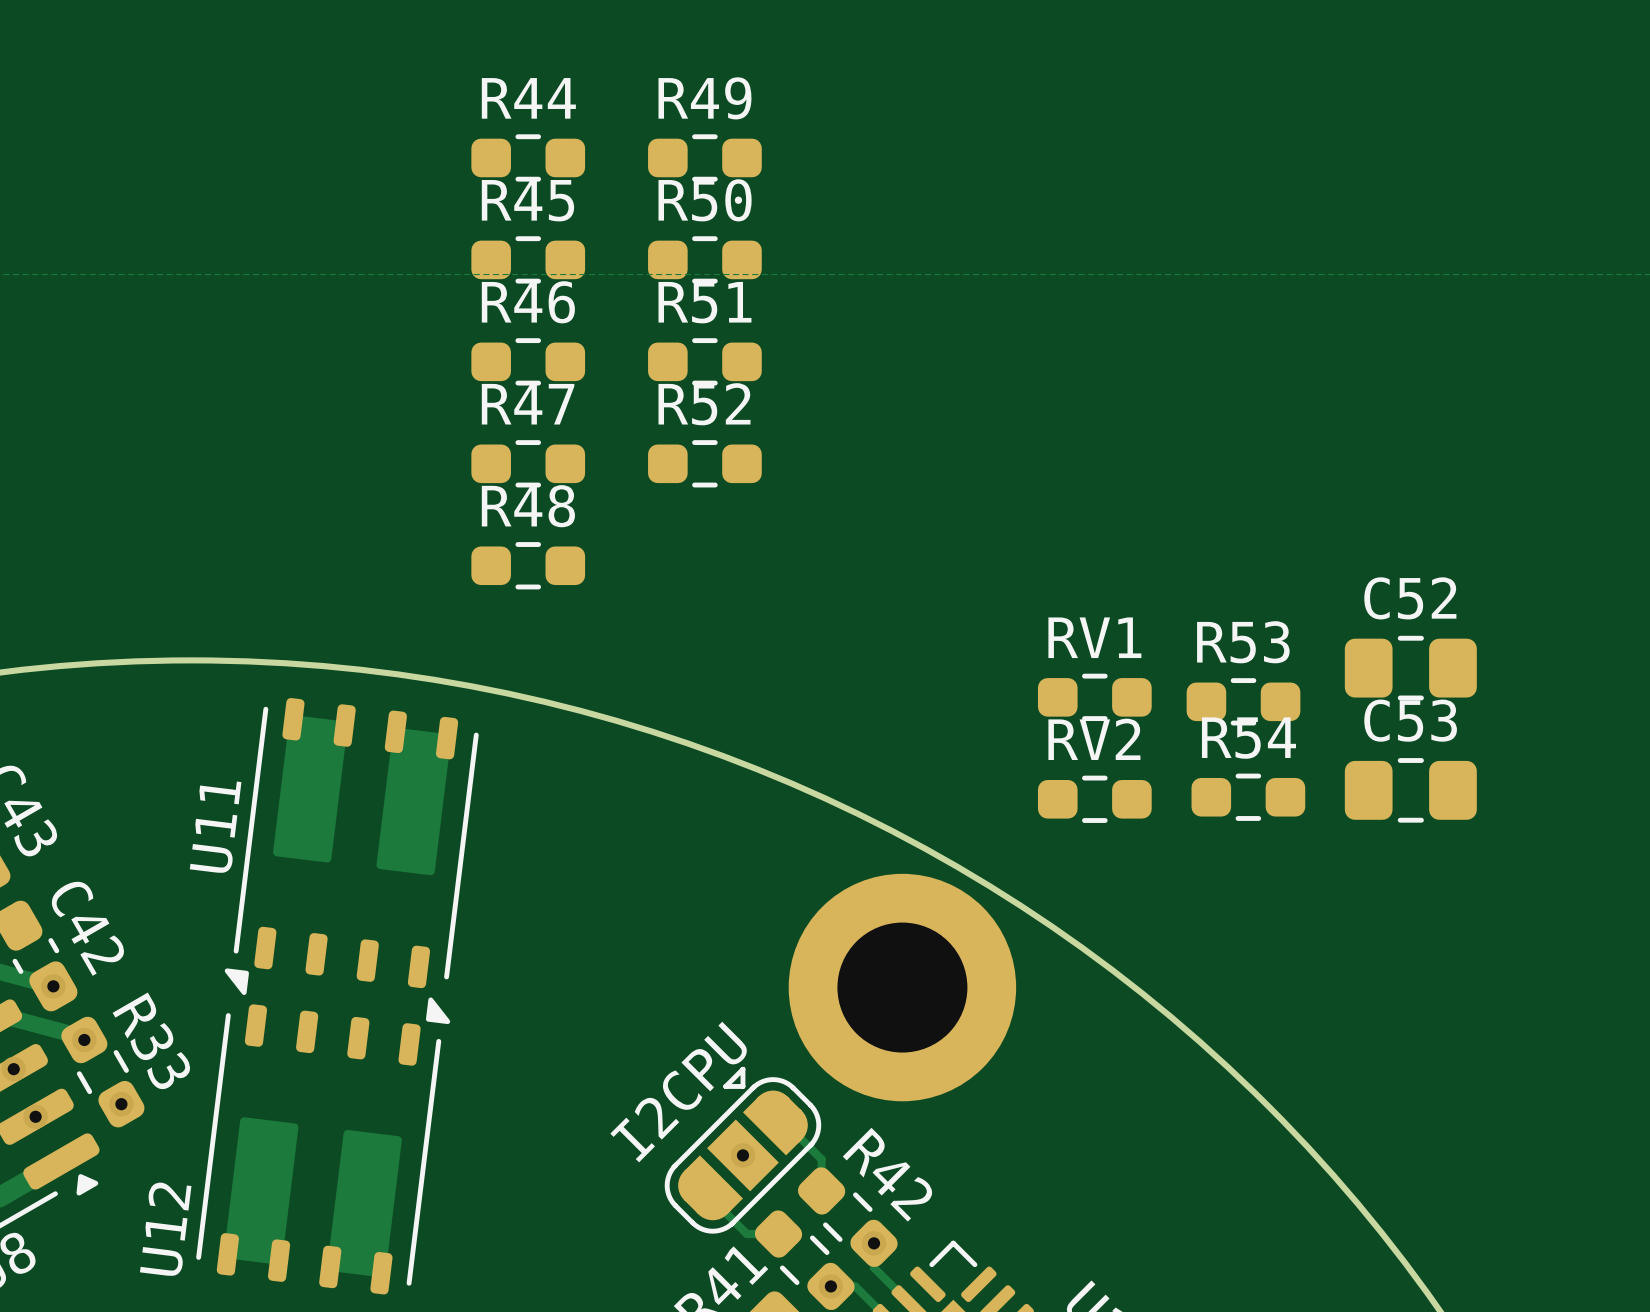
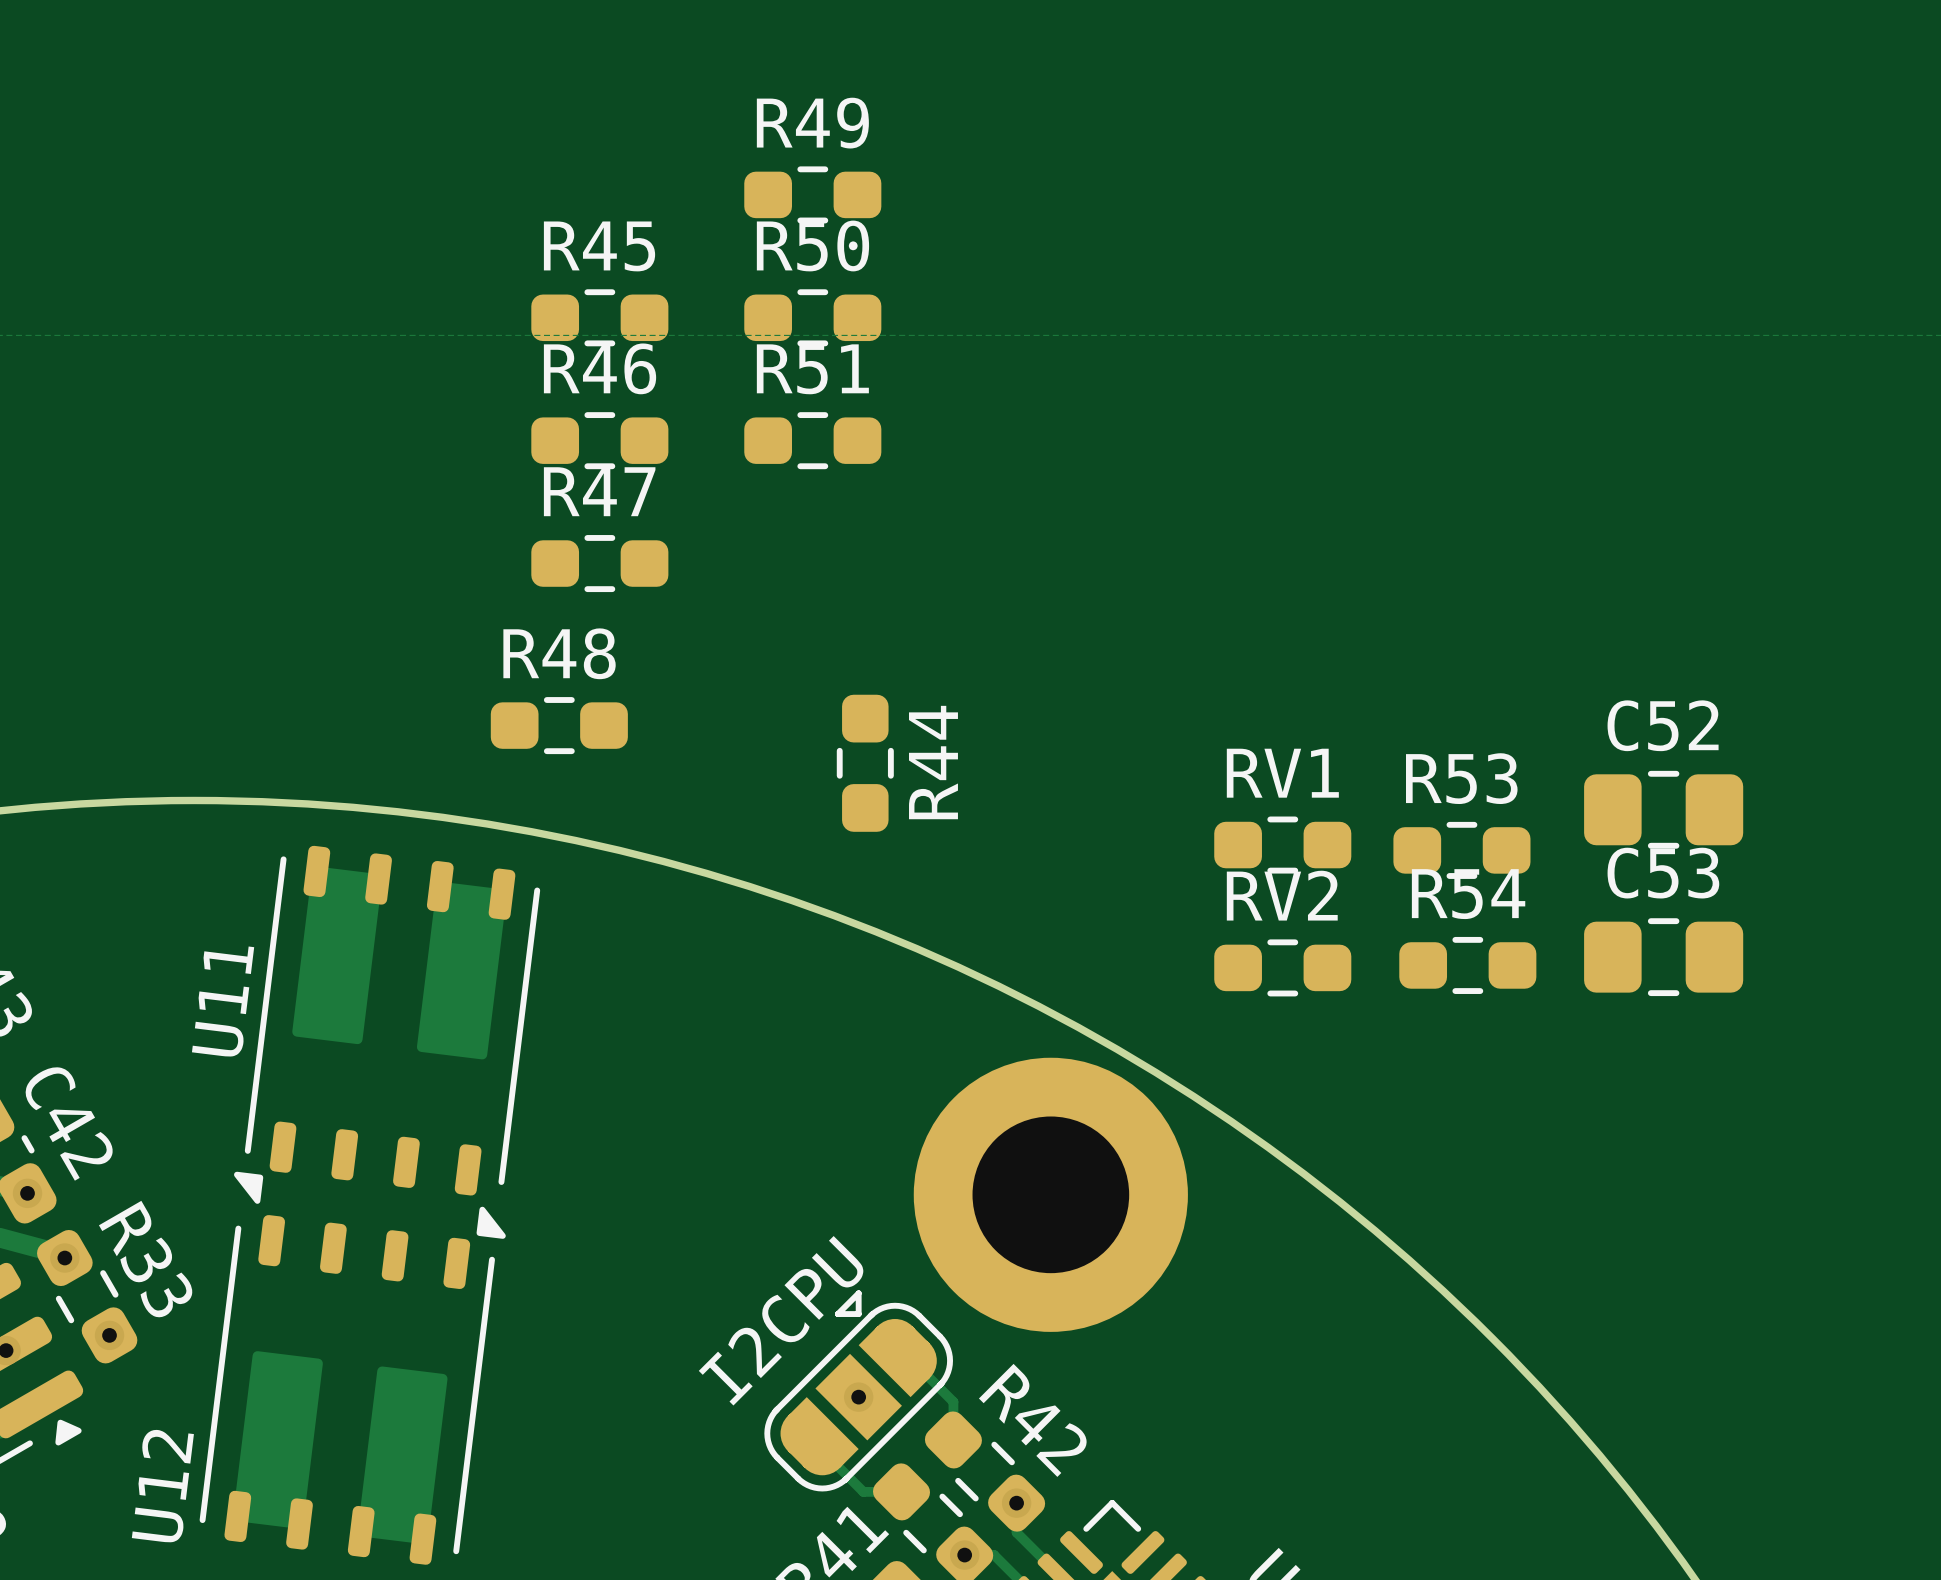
R44 rotation: 0° (528, 157) -> 90° clockwise (865, 763)
R44 position: (528, 157) -> (865, 763)
R52: (704, 463) -> none
R48 position: (528, 565) -> (559, 725)

